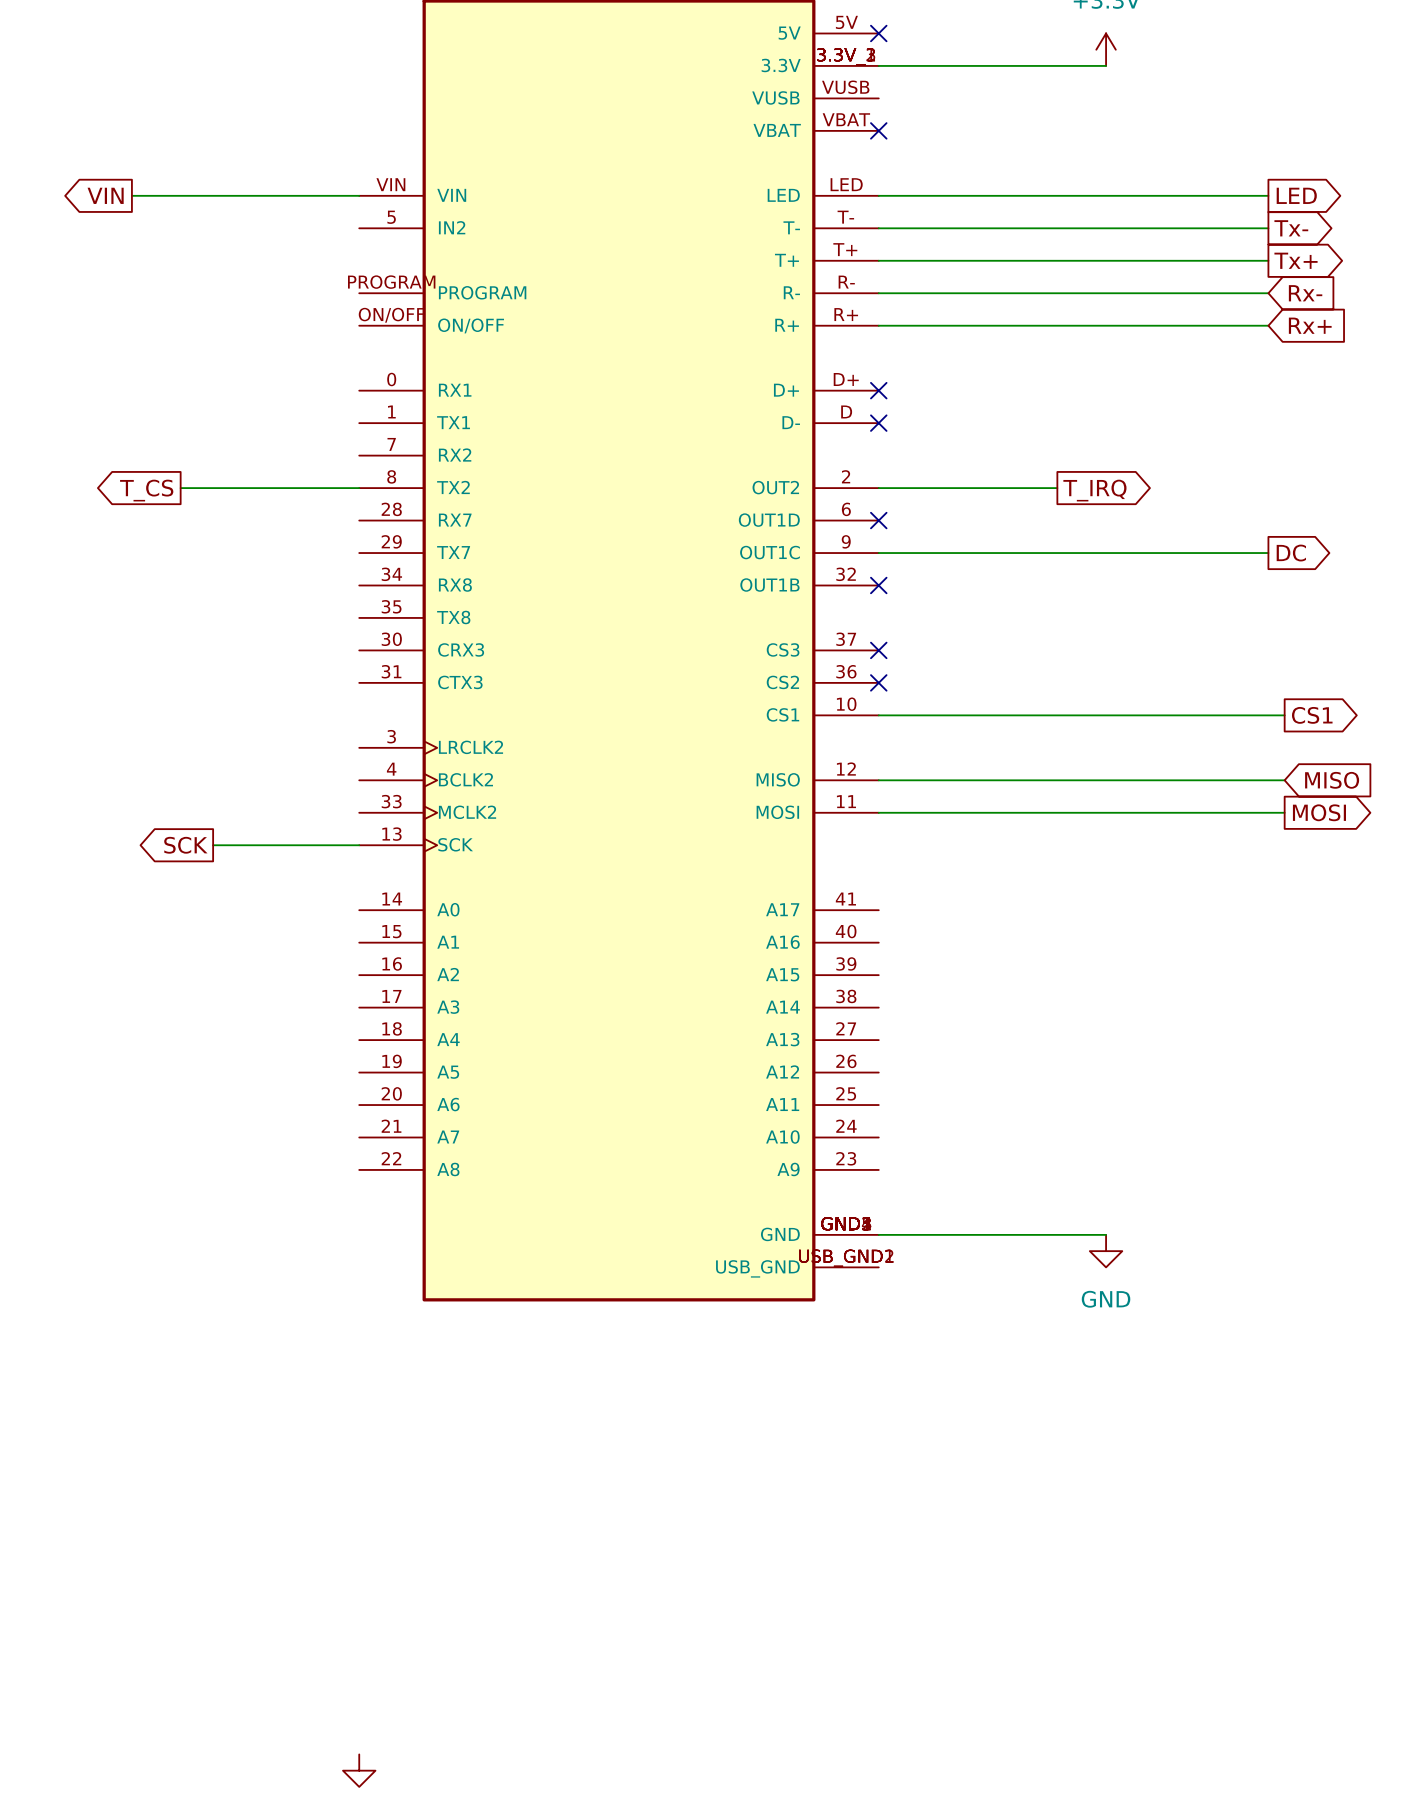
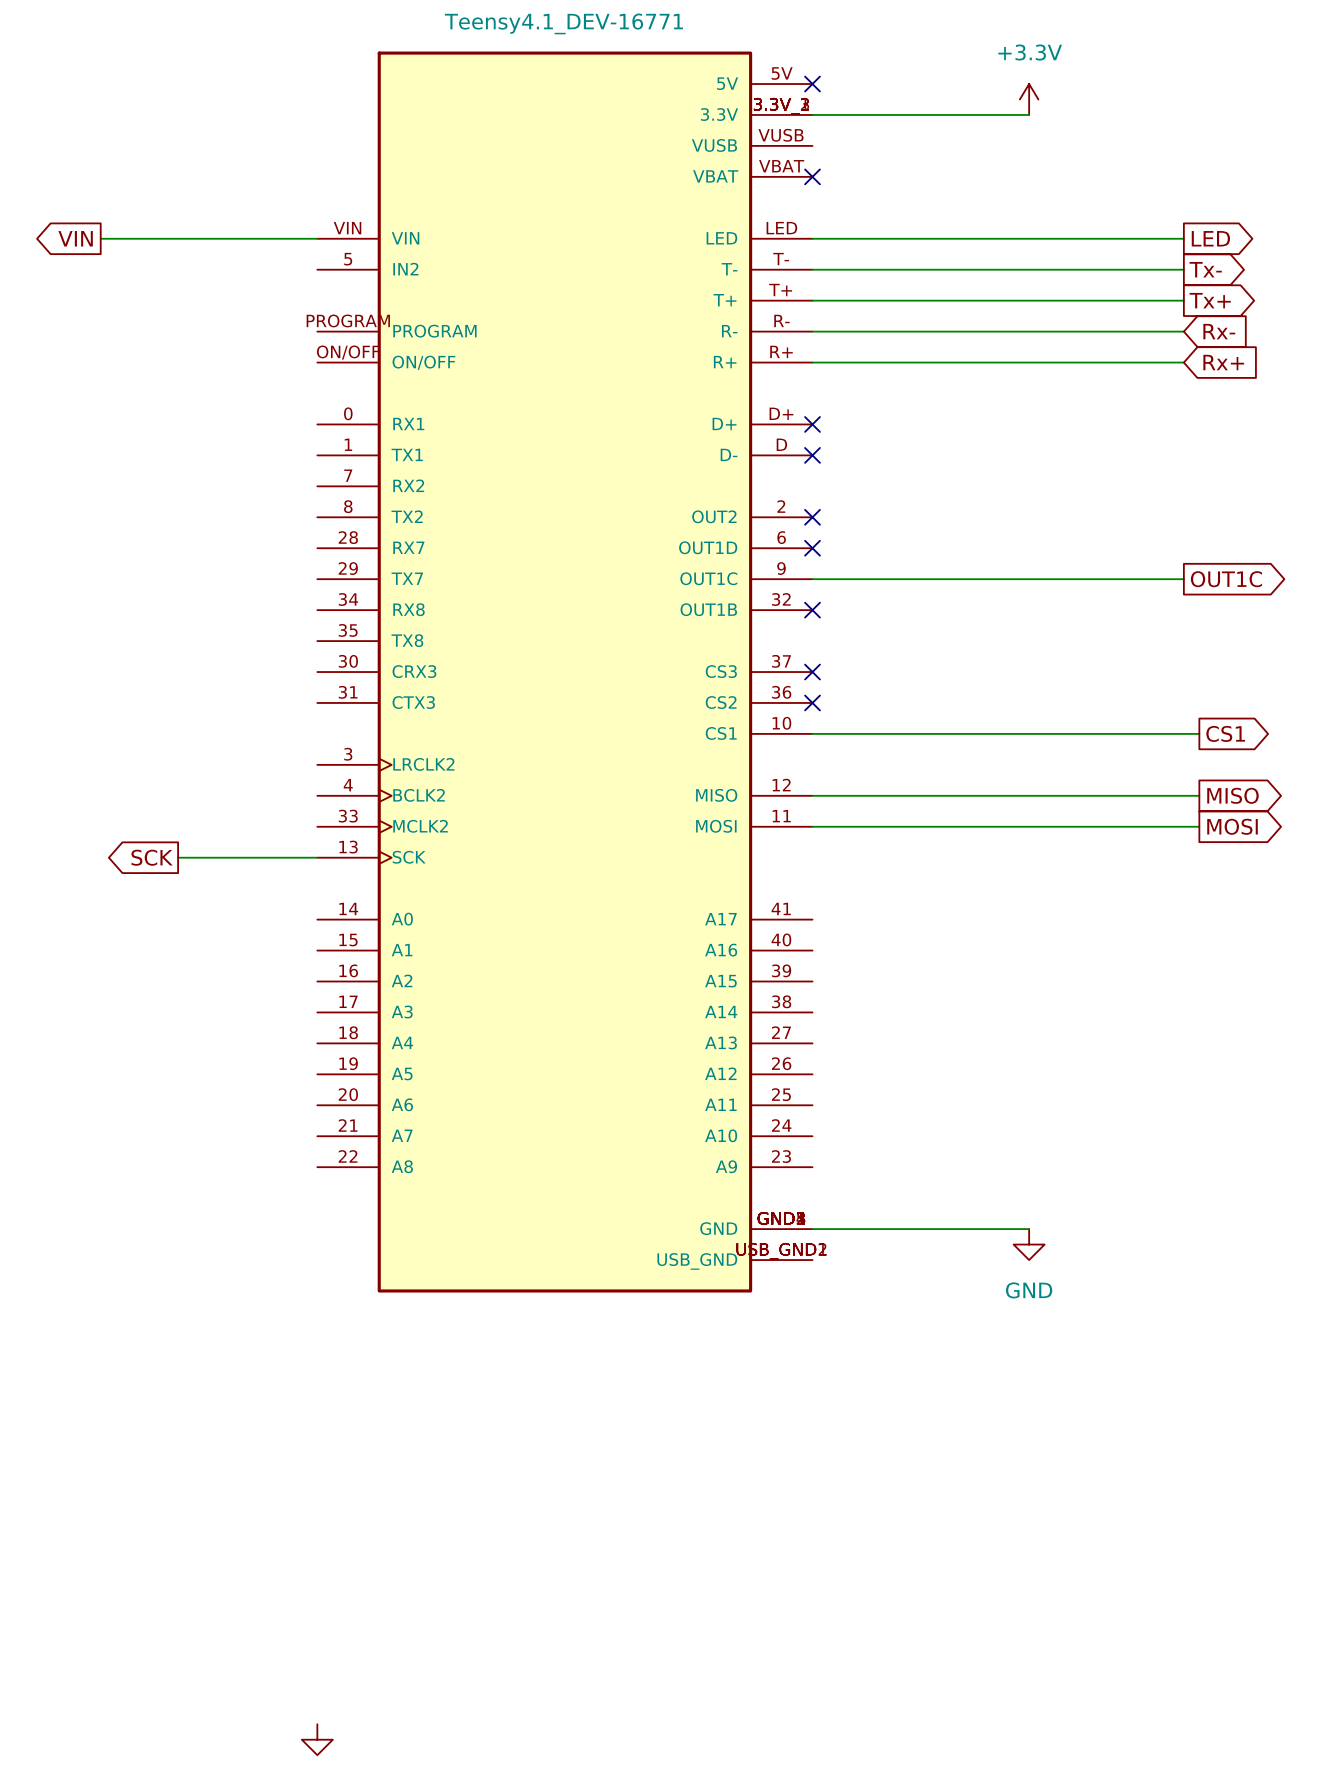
wire: (180, 488) (359, 488) -> none
wire: (878, 488) (1057, 488) -> none
no-connect mark: none -> (812, 517)
global label: T_CS (146, 490) -> none
global label: T_IRQ (1094, 490) -> none
global label: DC (1291, 553) -> OUT1C (1226, 579)
global label shape: input (1332, 780) -> output (1232, 795)

